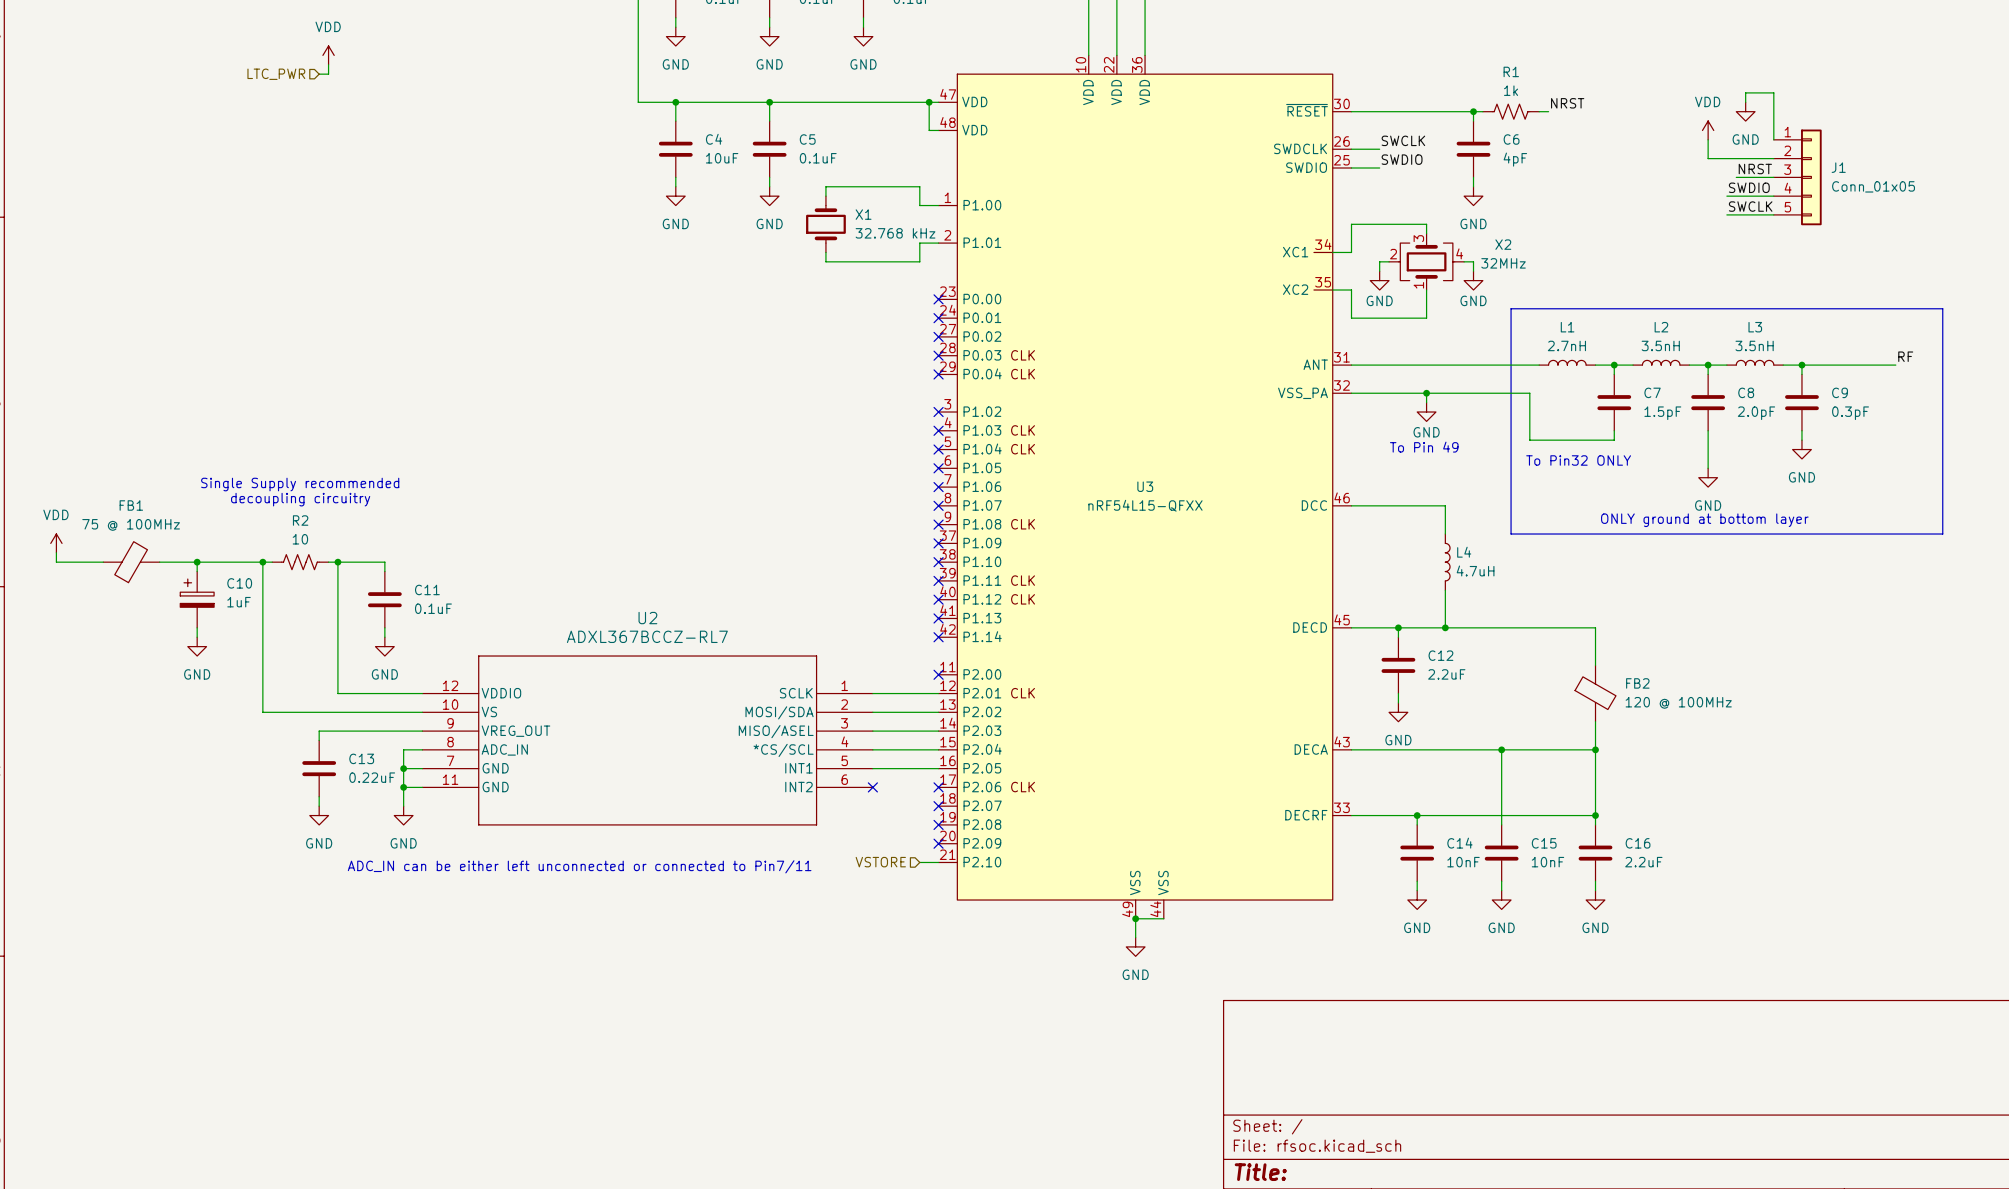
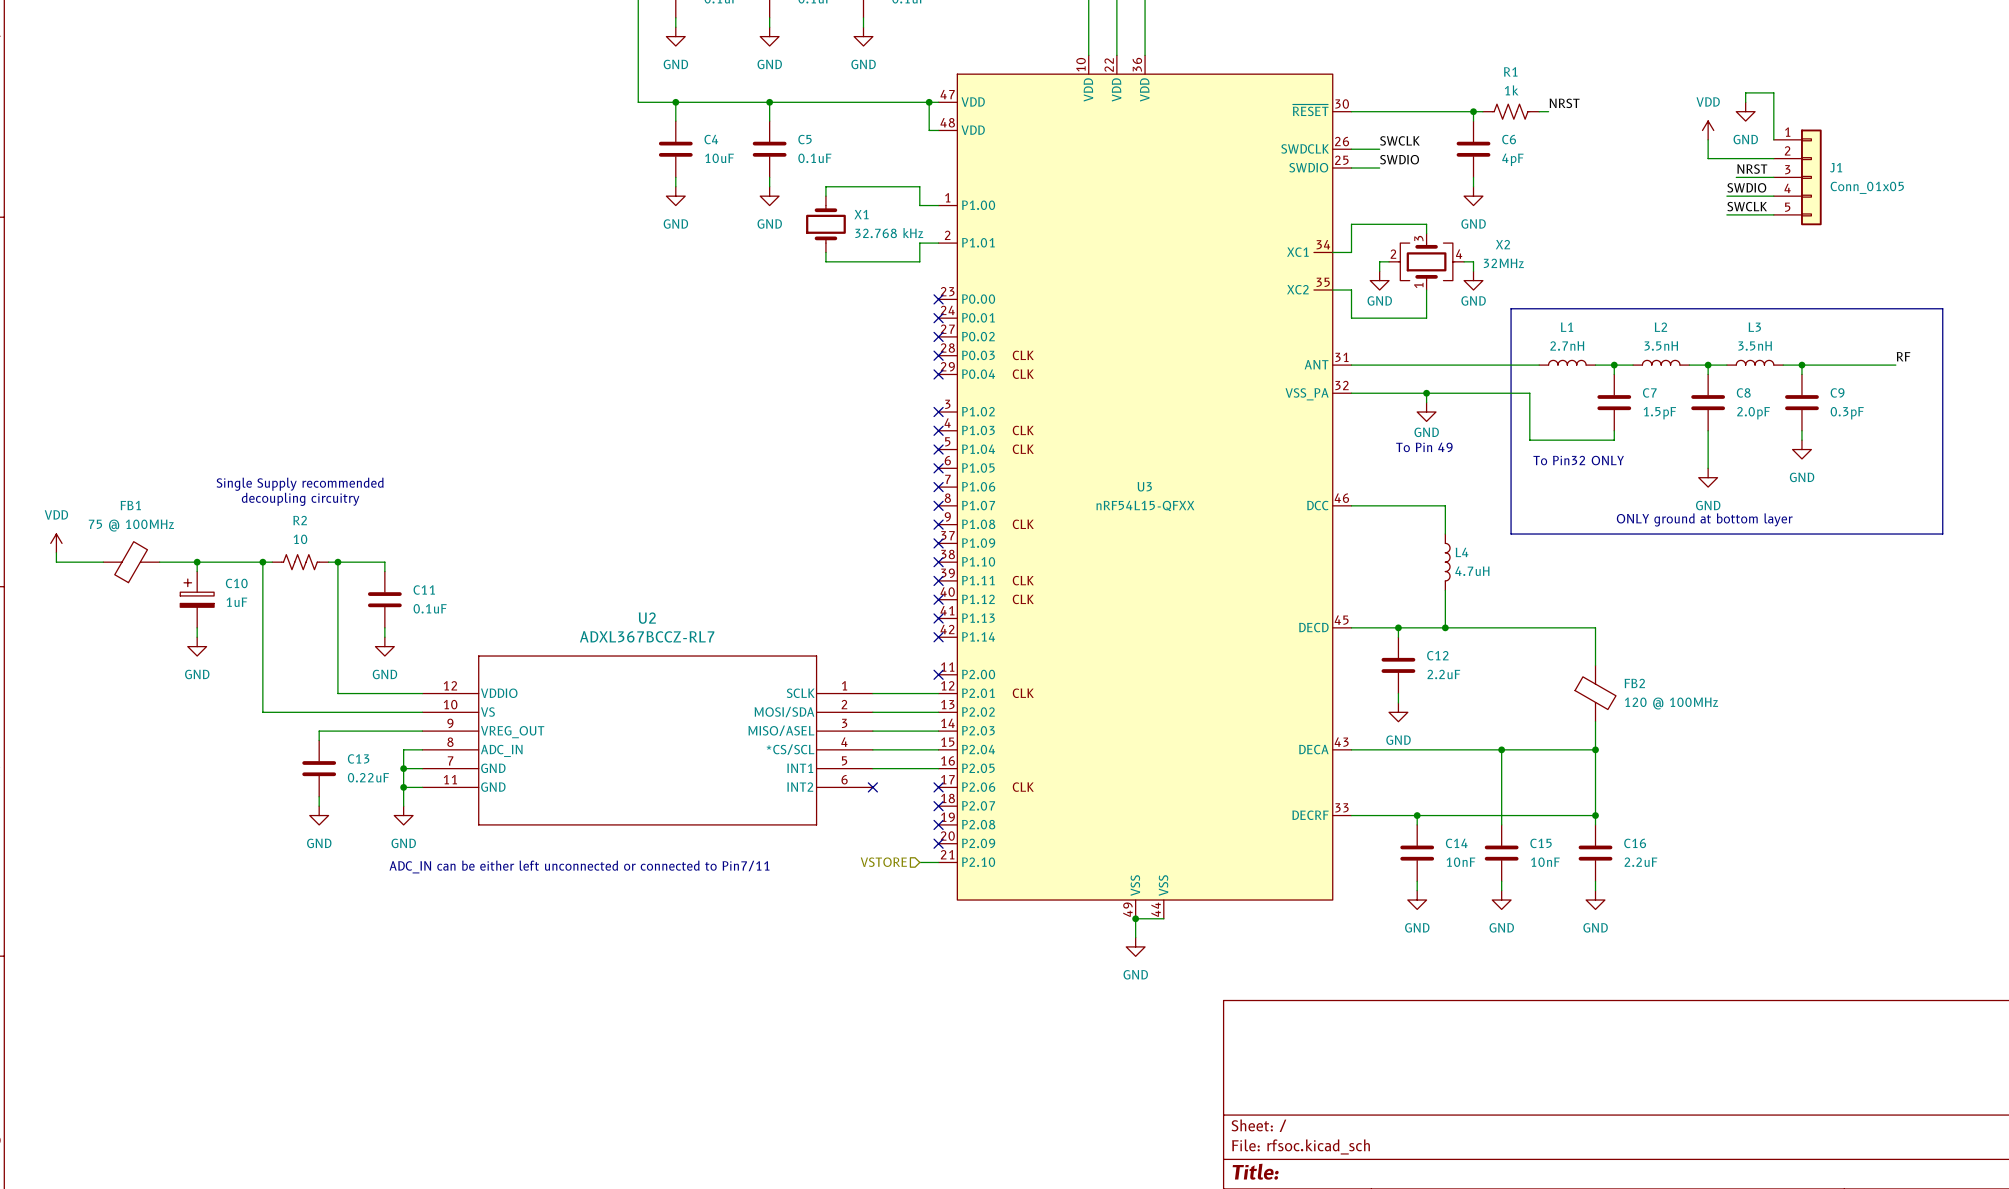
power symbol: VDD (328, 55) -> none
wire: (328, 64) (328, 74) (319, 74) -> none
hierarchical label: LTC_PWR (276, 74) -> none

